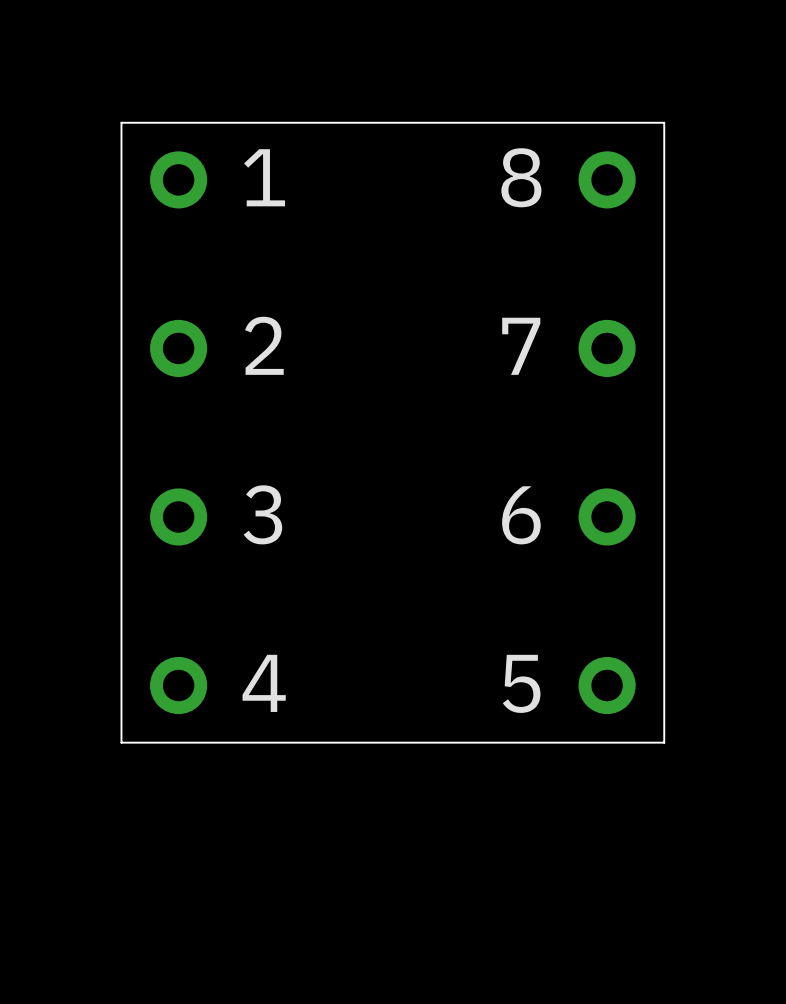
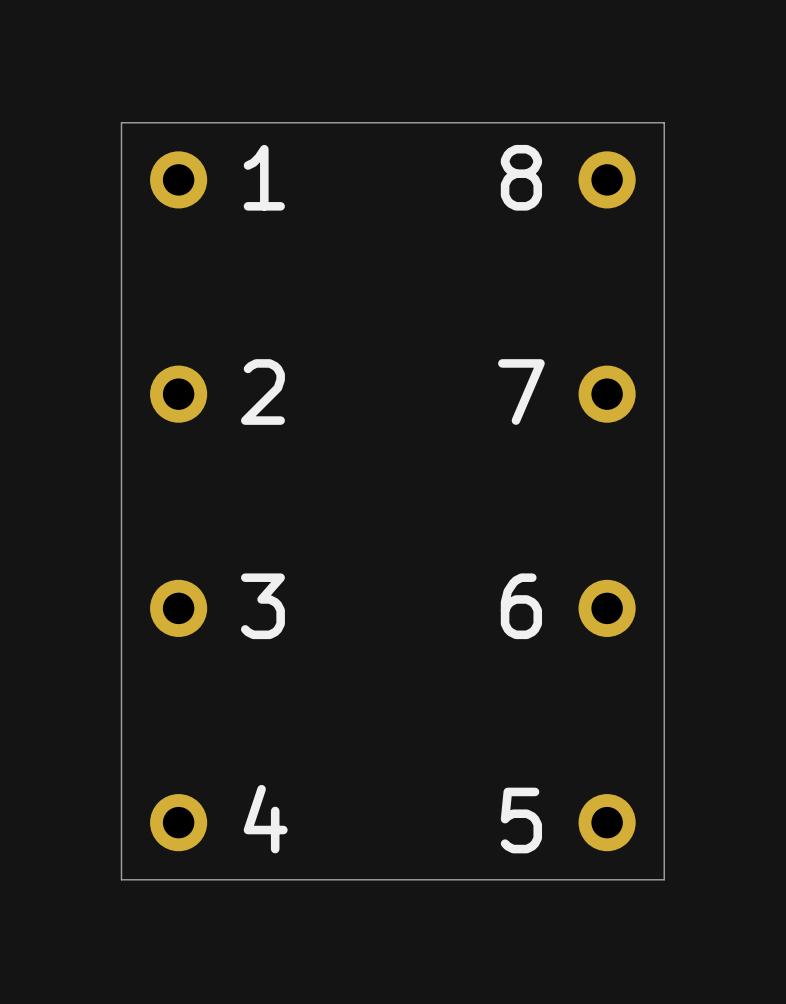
part position: (178, 348) -> (178, 394)
part position: (607, 348) -> (607, 394)
part position: (178, 516) -> (178, 608)
part position: (607, 516) -> (607, 608)
part position: (178, 685) -> (178, 822)
part position: (607, 685) -> (607, 822)
board edge: (121, 742) (664, 742) -> (121, 742) (121, 879) (664, 879) (664, 742)

